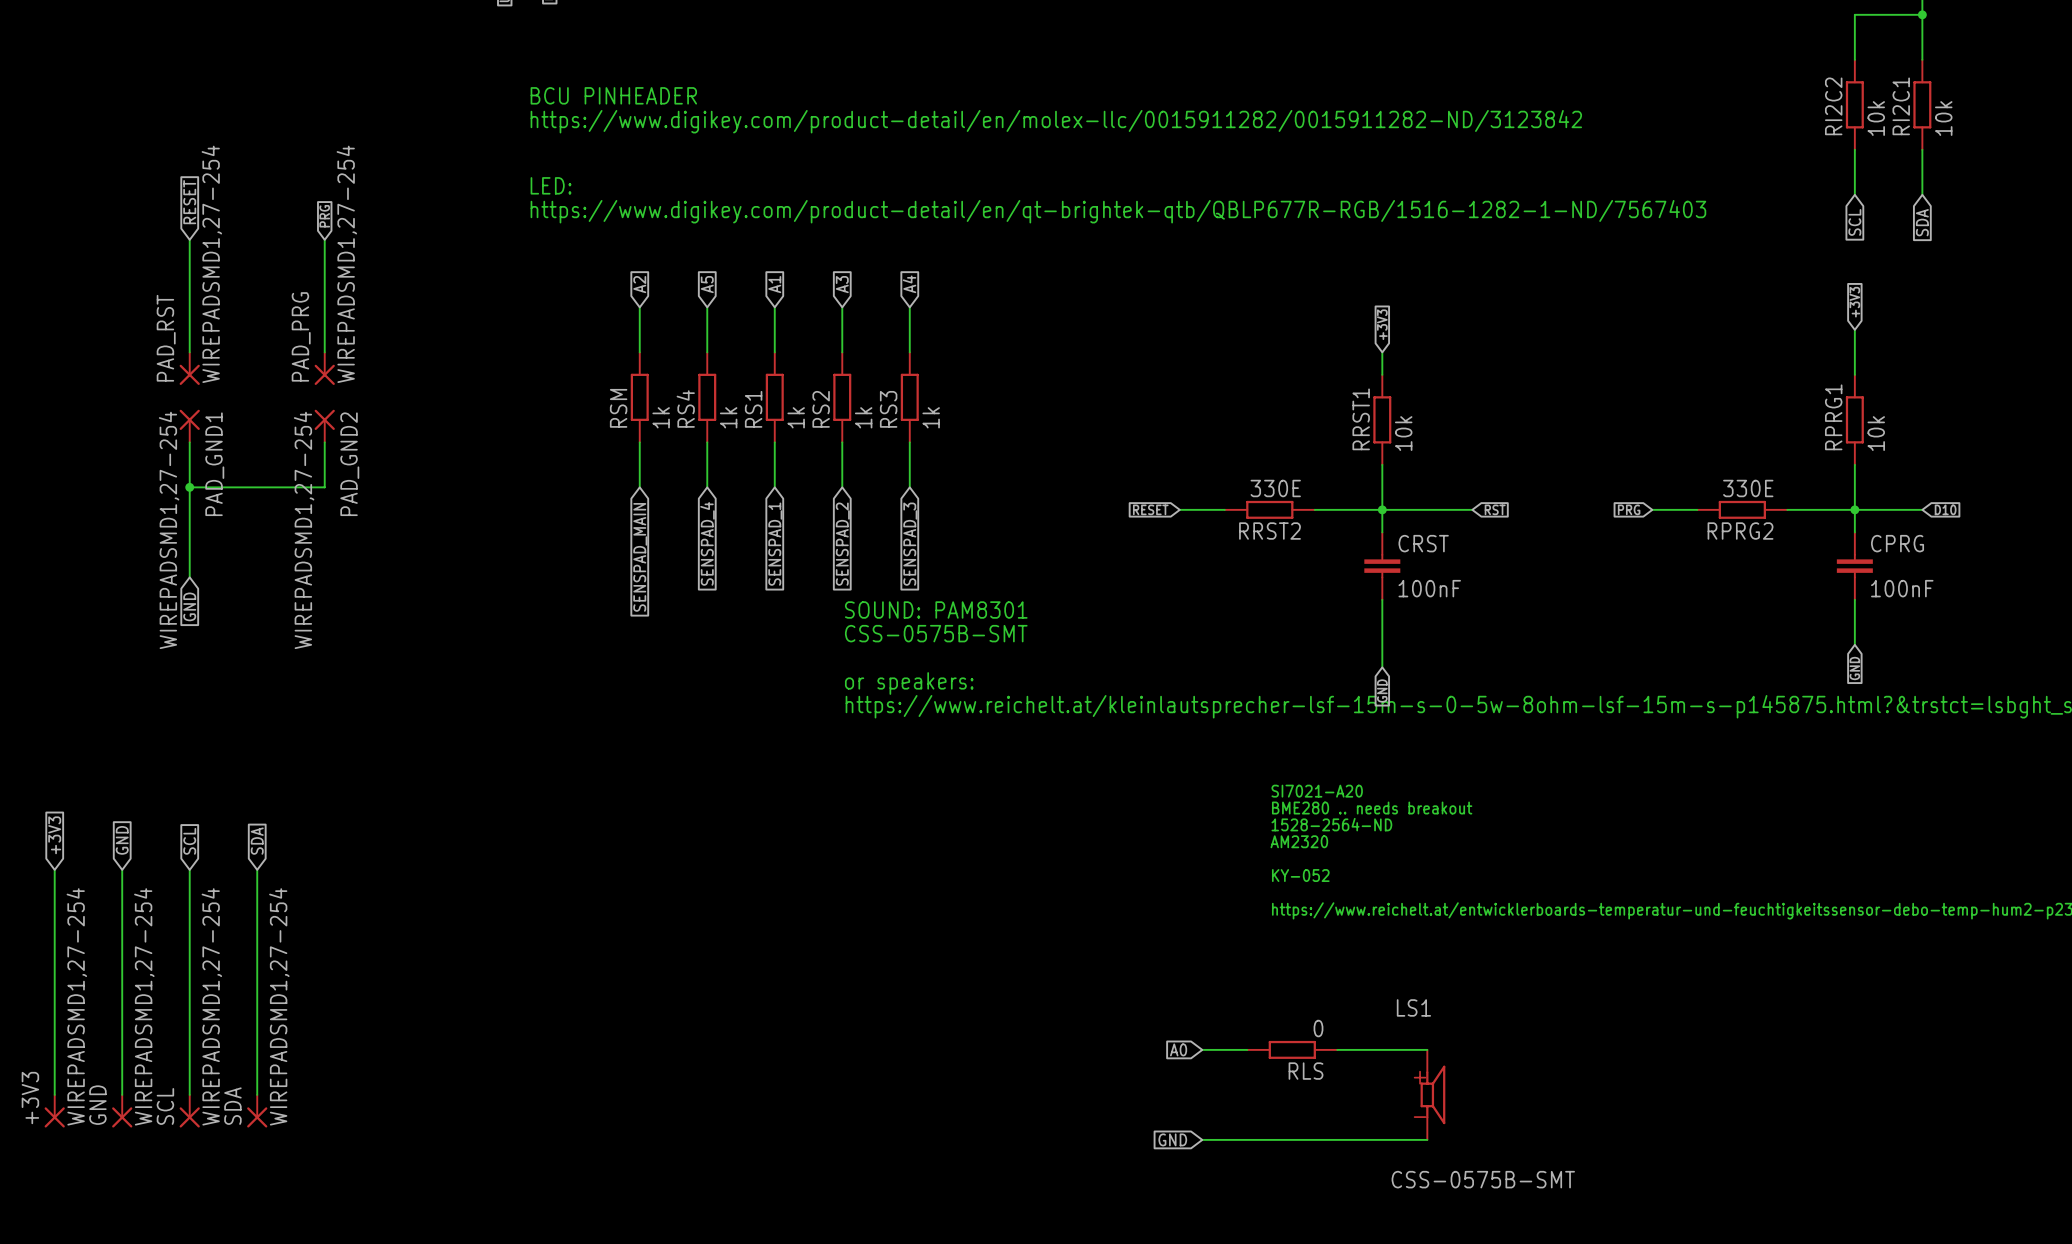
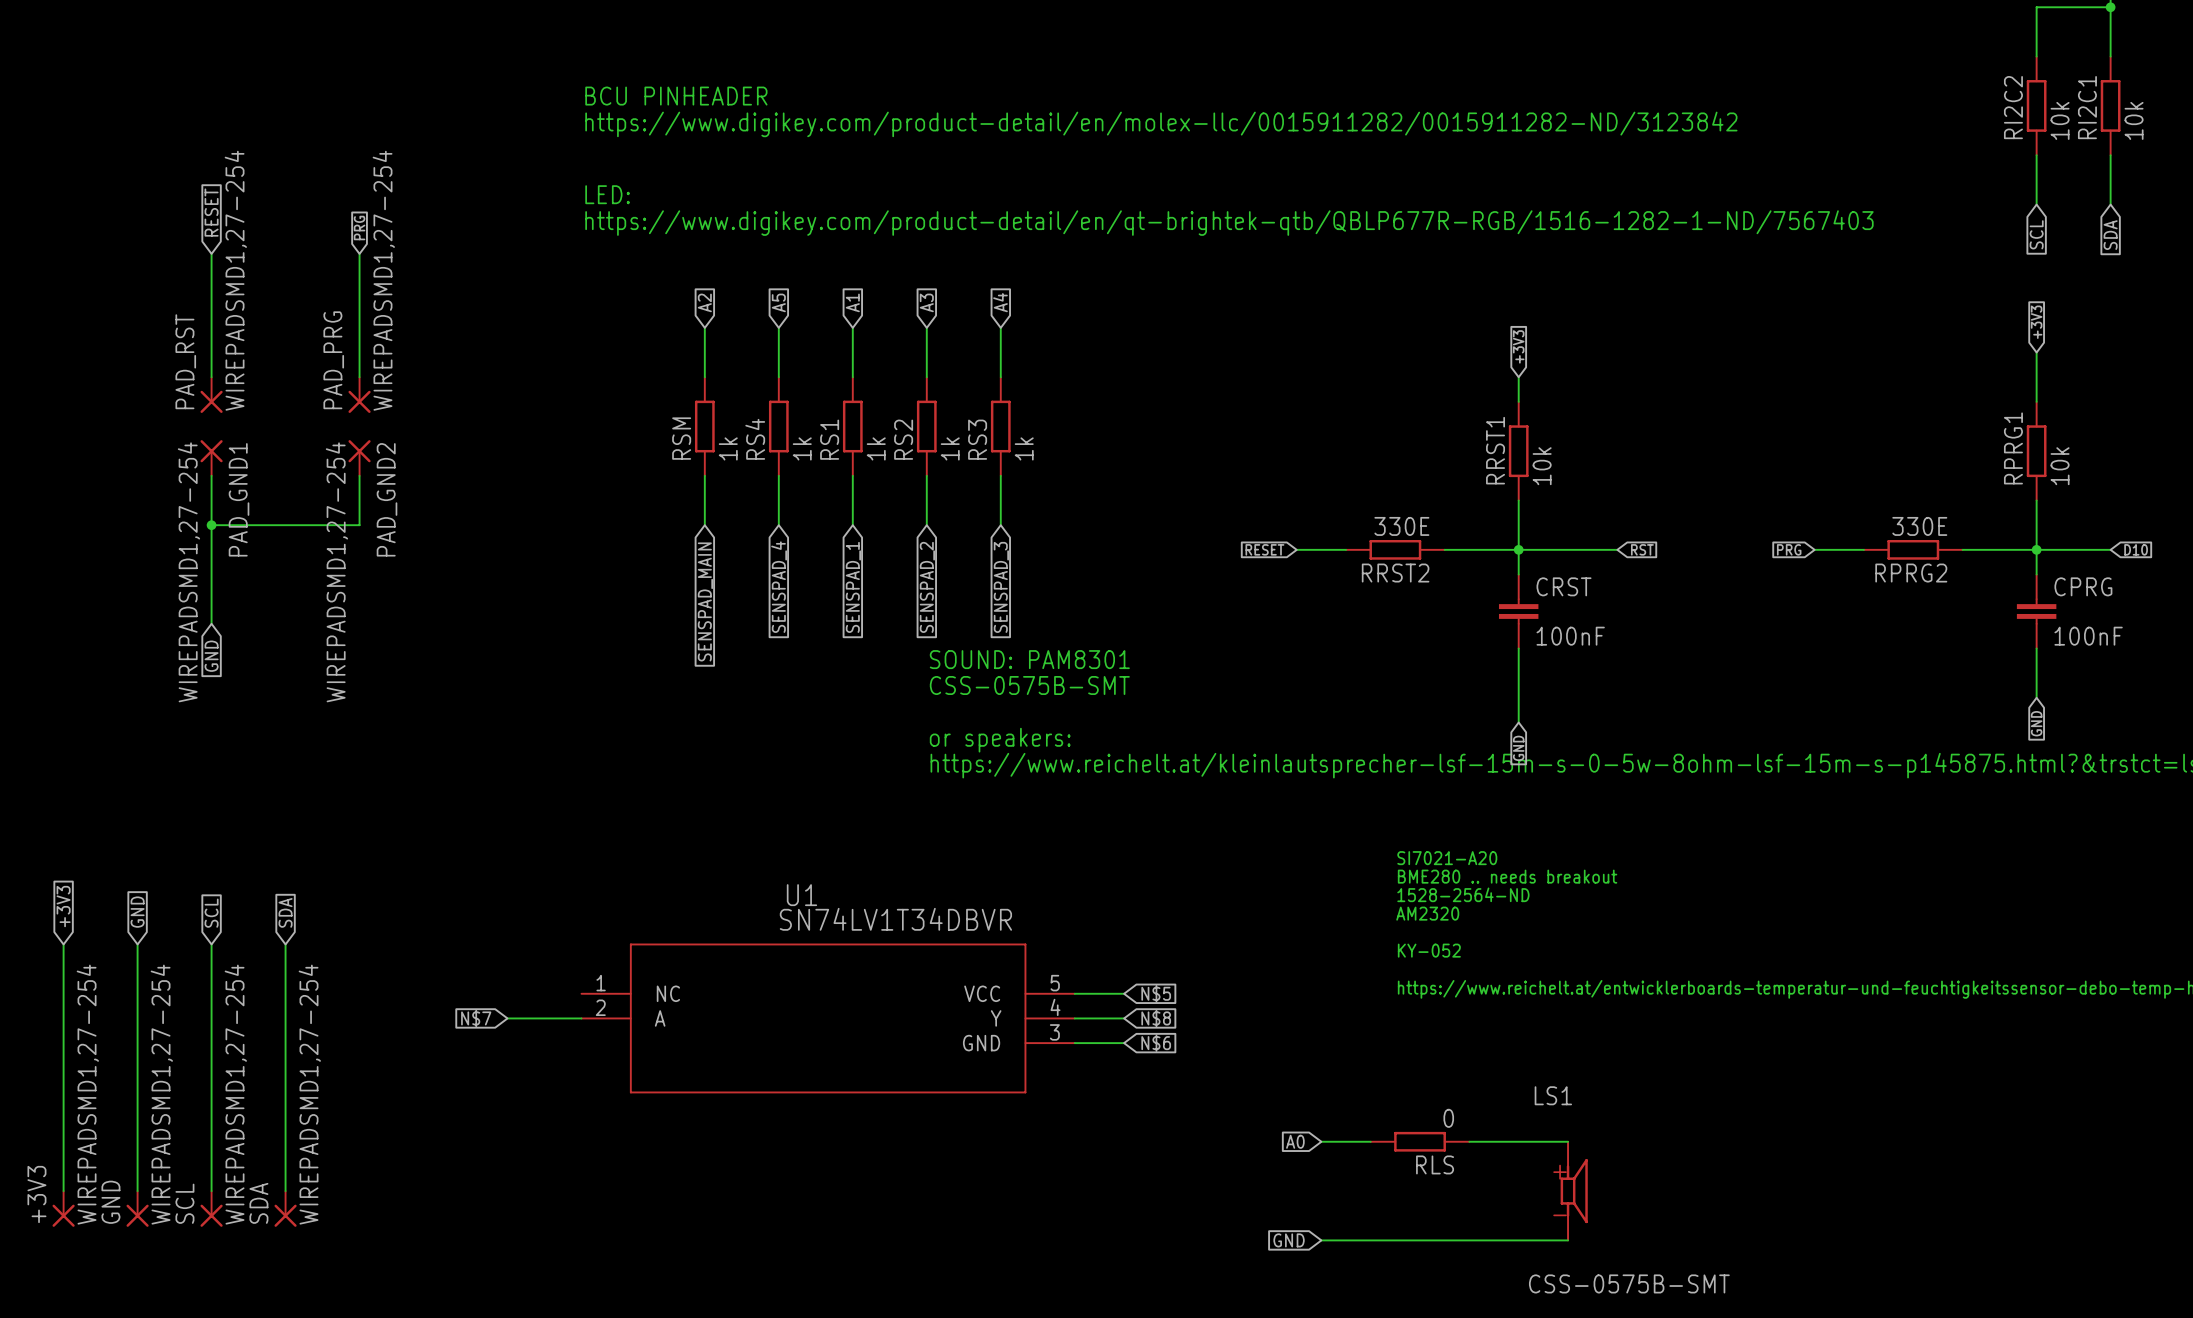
wire: none -> (1074, 993) (1124, 993)
global label: none -> N$5 (1156, 993)
global label: none -> N$7 (476, 1018)
wire: none -> (507, 1018) (581, 1018)
U1: none -> SN74LV1T34DBVR (828, 1018)
wire: none -> (1074, 1018) (1124, 1018)
global label: none -> N$8 (1156, 1018)
wire: none -> (1074, 1043) (1124, 1043)
global label: none -> N$6 (1156, 1043)

